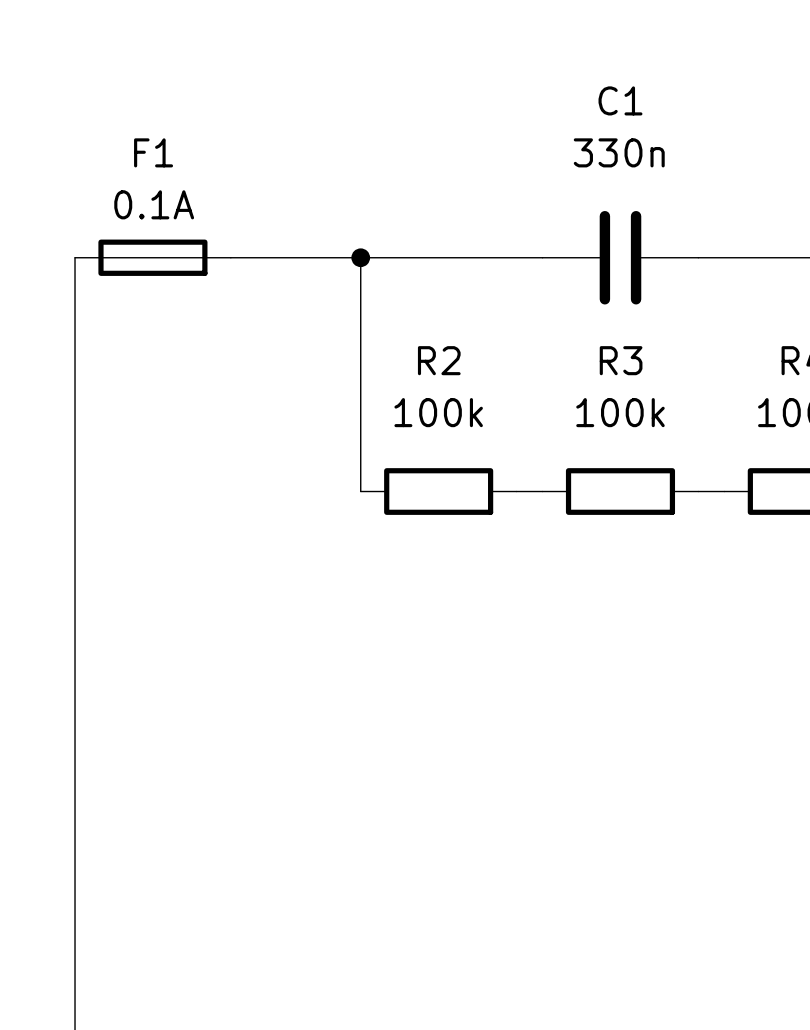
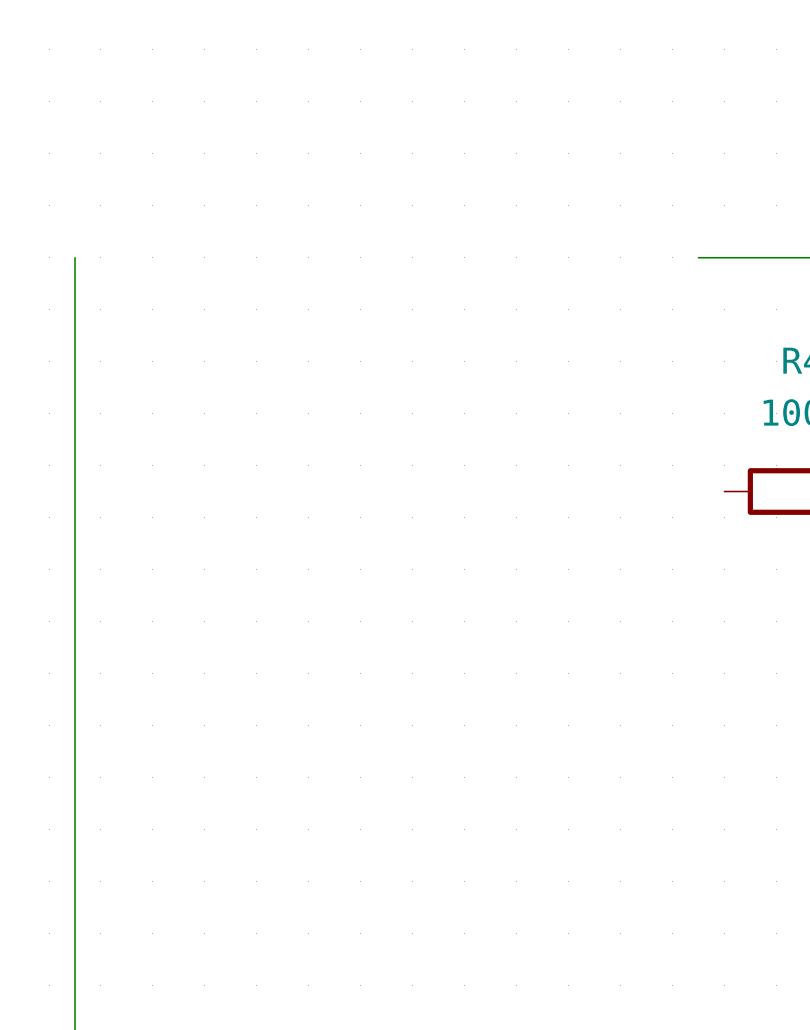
F1: 0.1A (152, 257) -> none
wire: (230, 257) (542, 257) -> none
wire: (360, 257) (360, 491) -> none
junction: (360, 257) -> none
C1: 330n (620, 257) -> none
R2: 100k (438, 491) -> none
wire: (516, 491) (542, 491) -> none
R3: 100k (620, 491) -> none
wire: (698, 491) (724, 491) -> none

